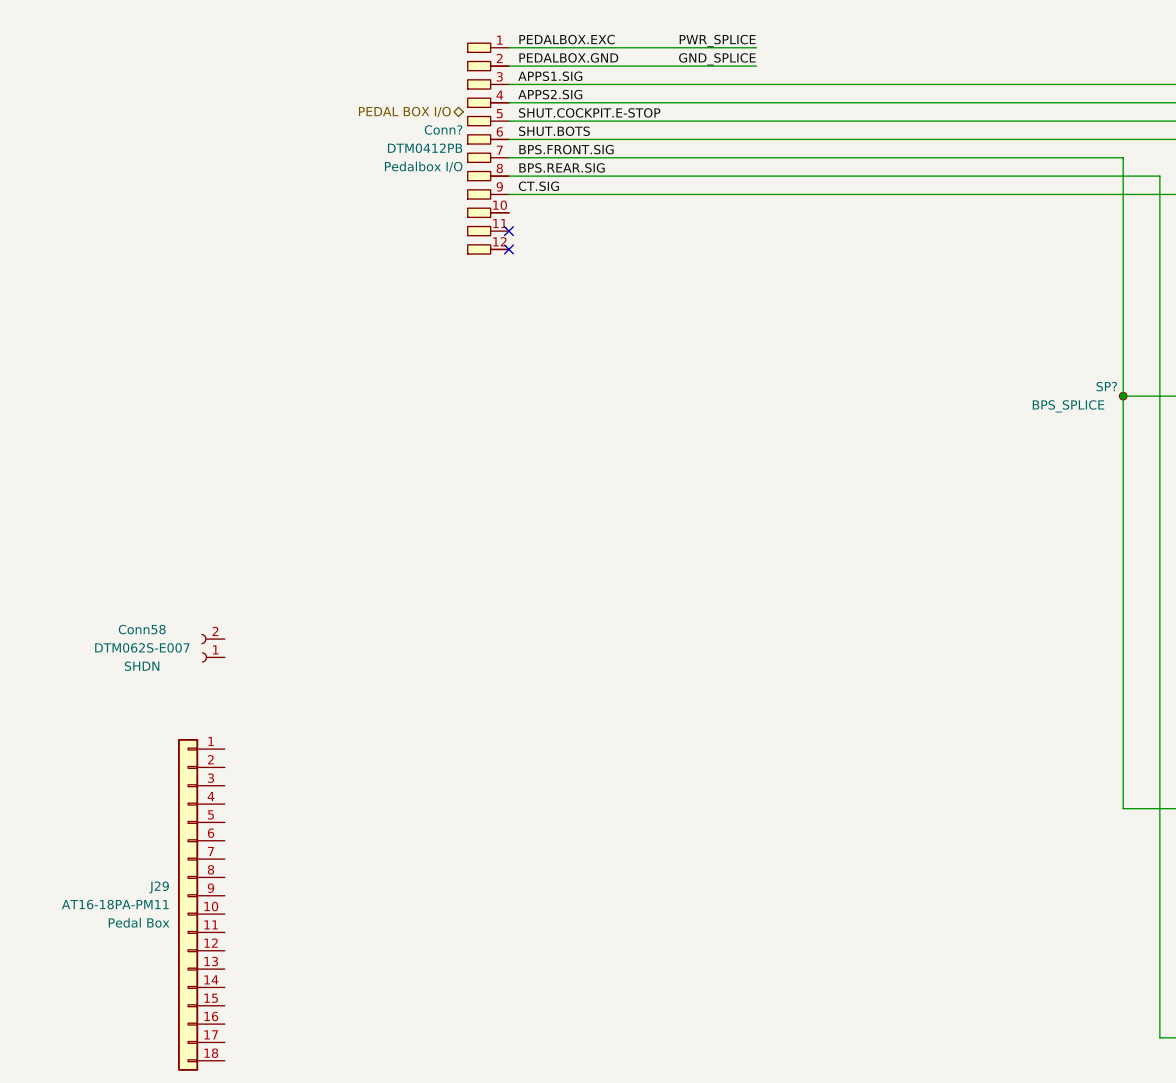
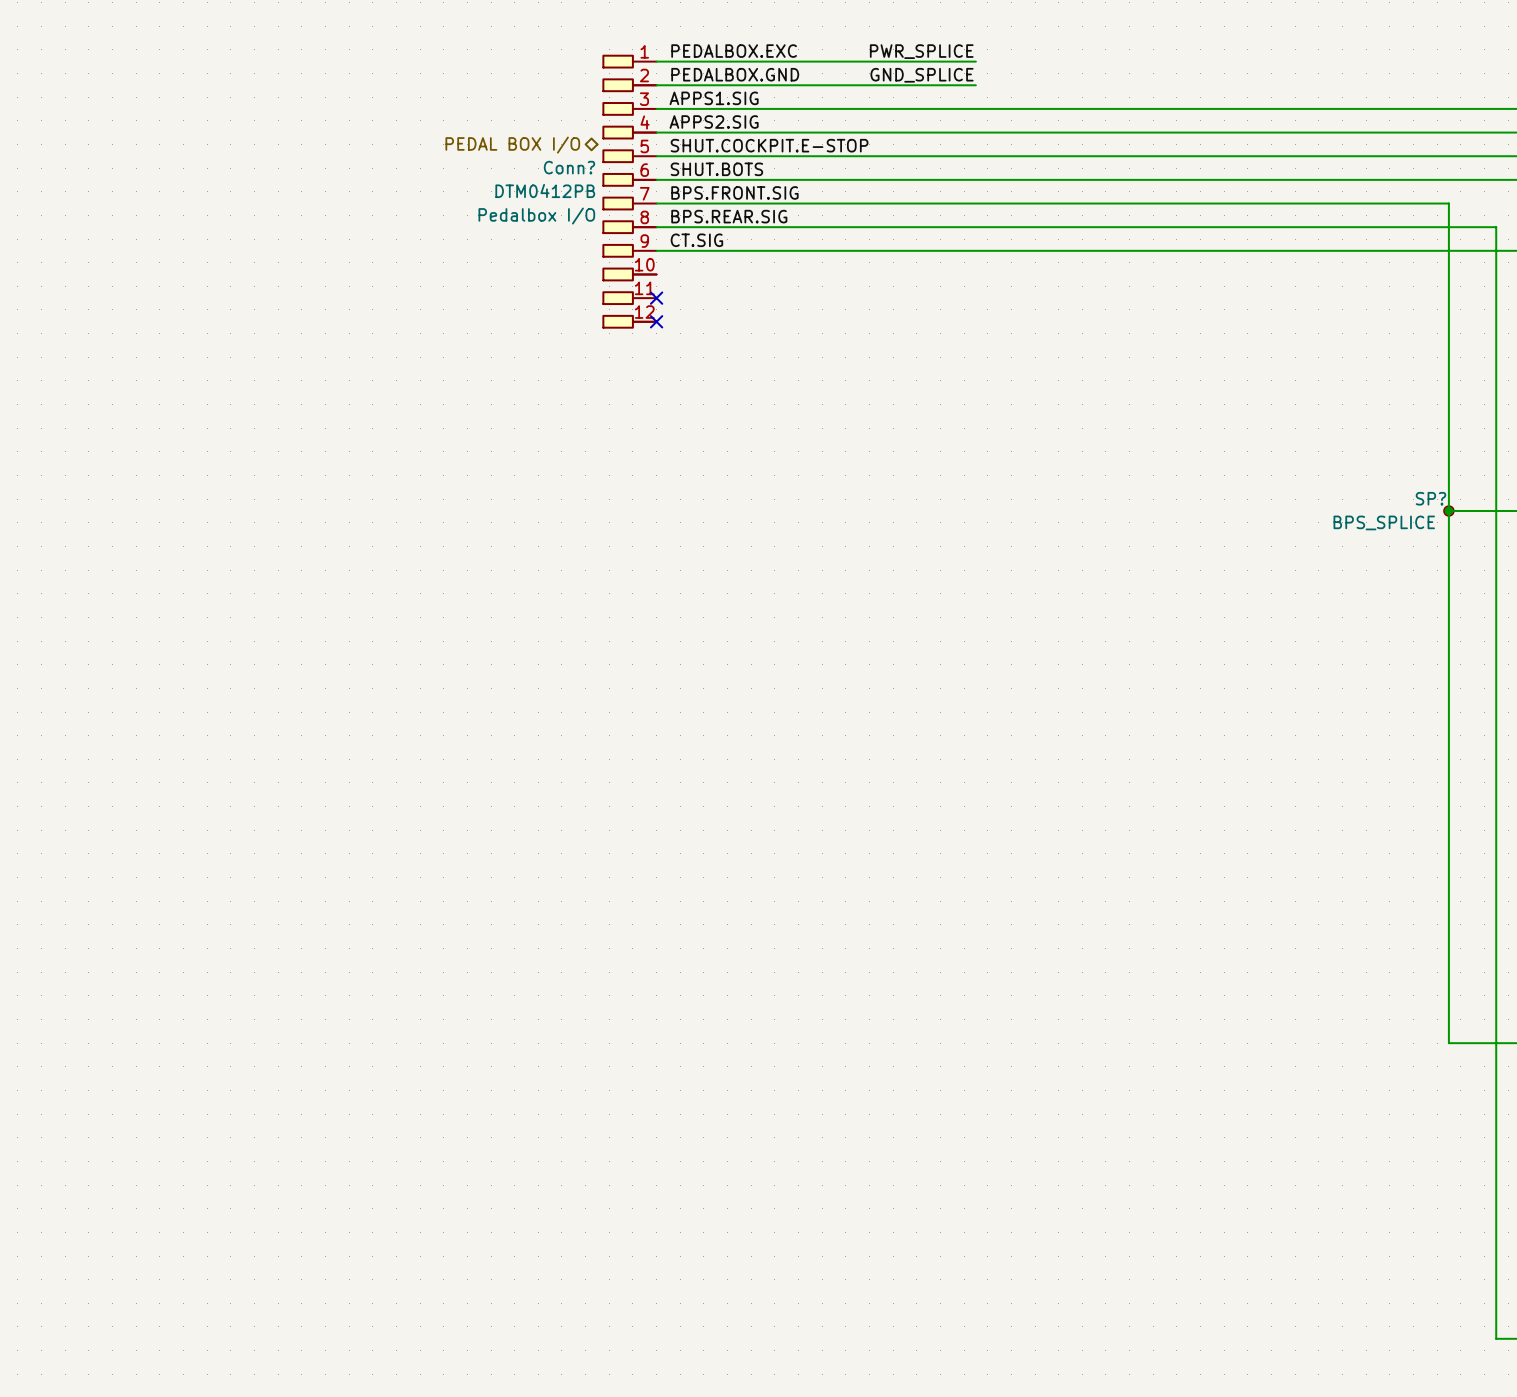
Conn58: (213, 648) -> none
J29: AT16-18PA-PM11 (201, 904) -> none

